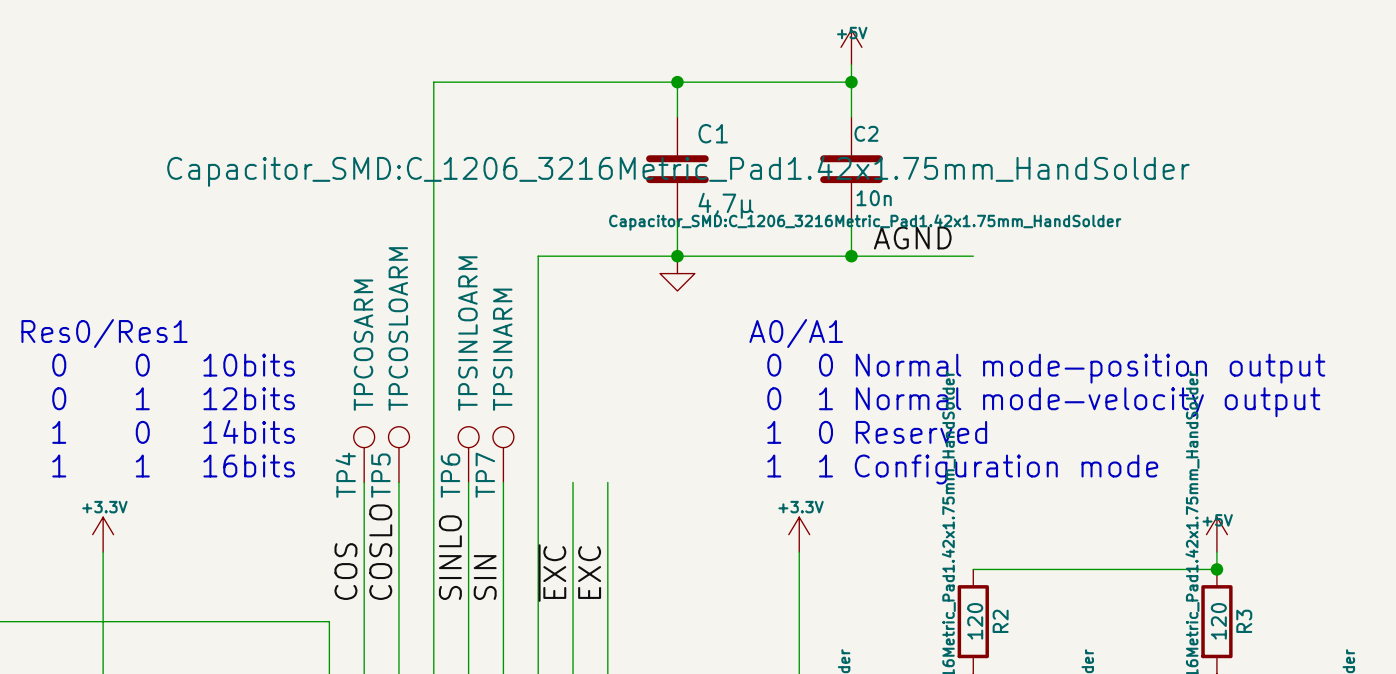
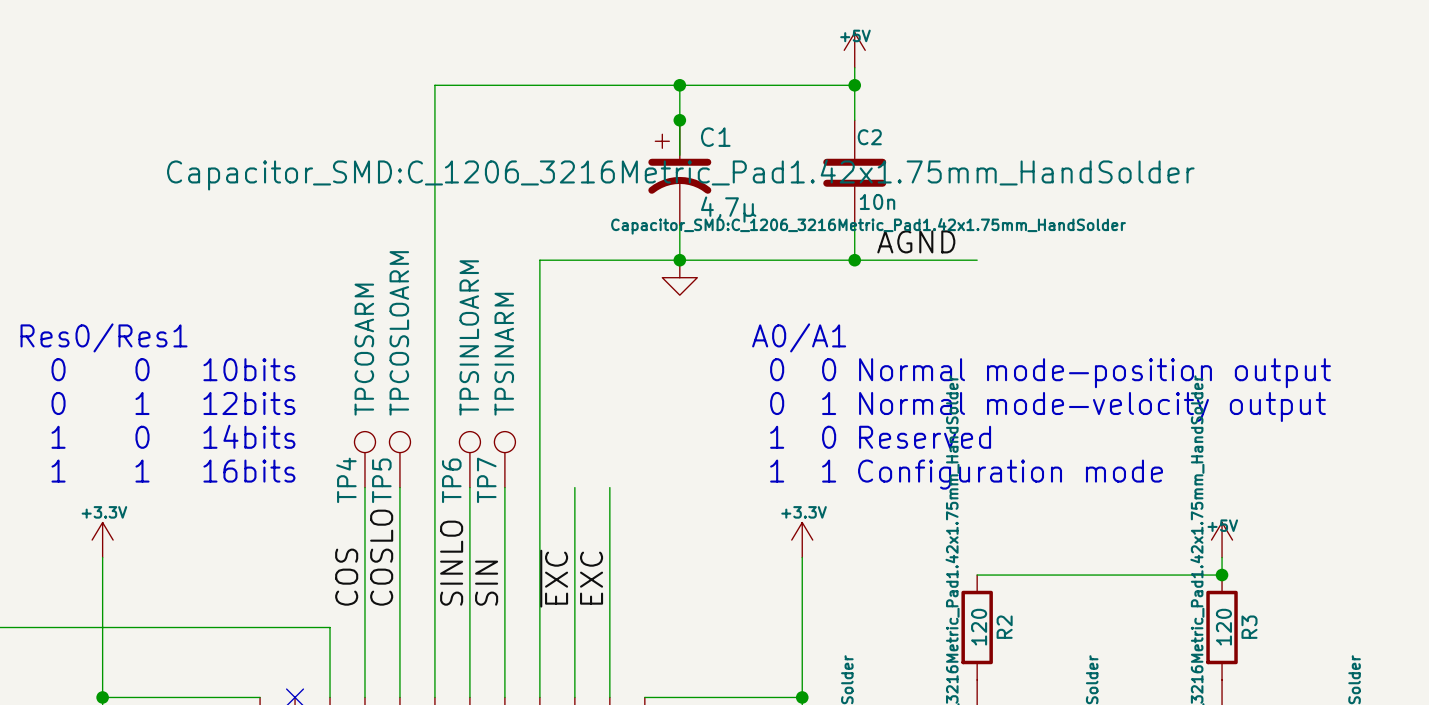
C1 symbol: [646, 116, 709, 222] -> [648, 120, 712, 226]
junction: none -> (679, 120)

